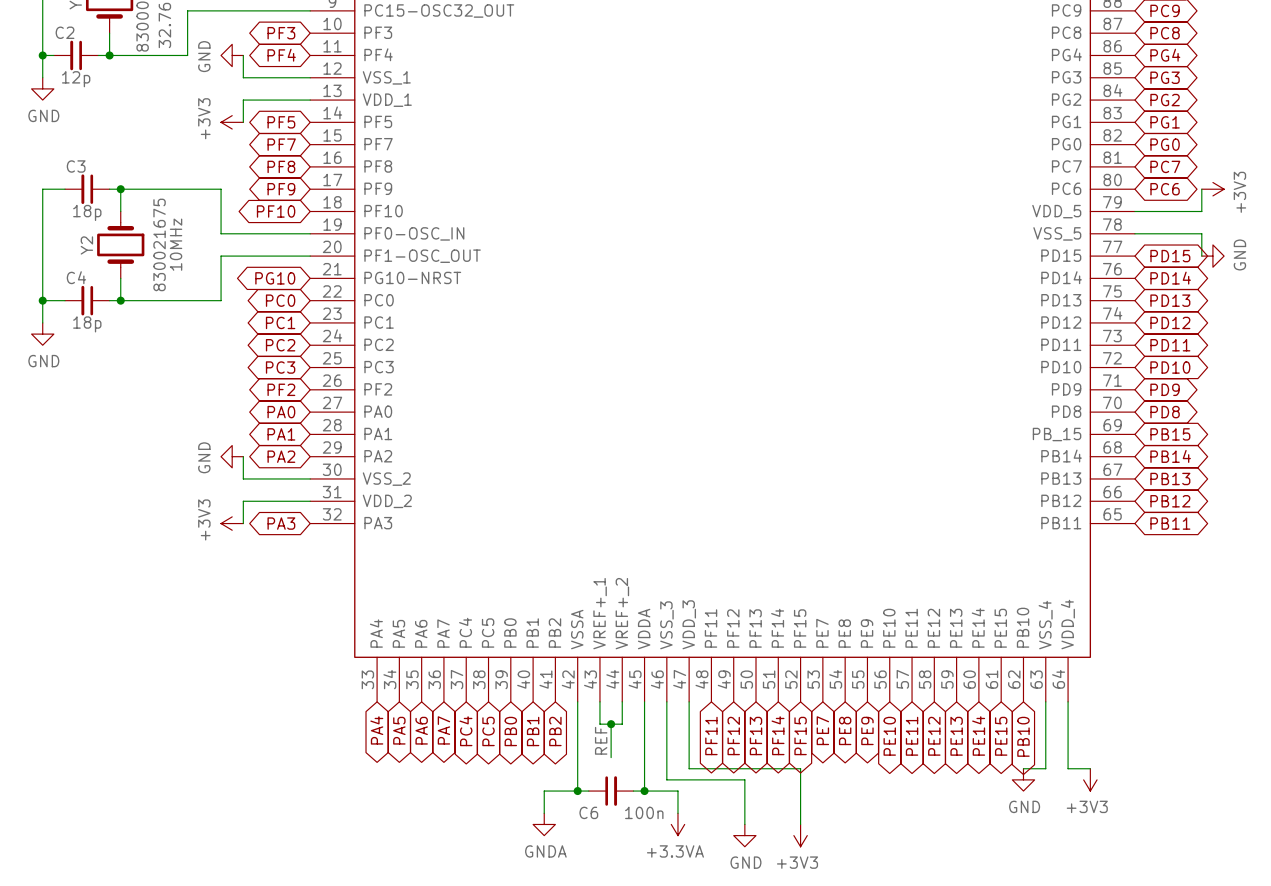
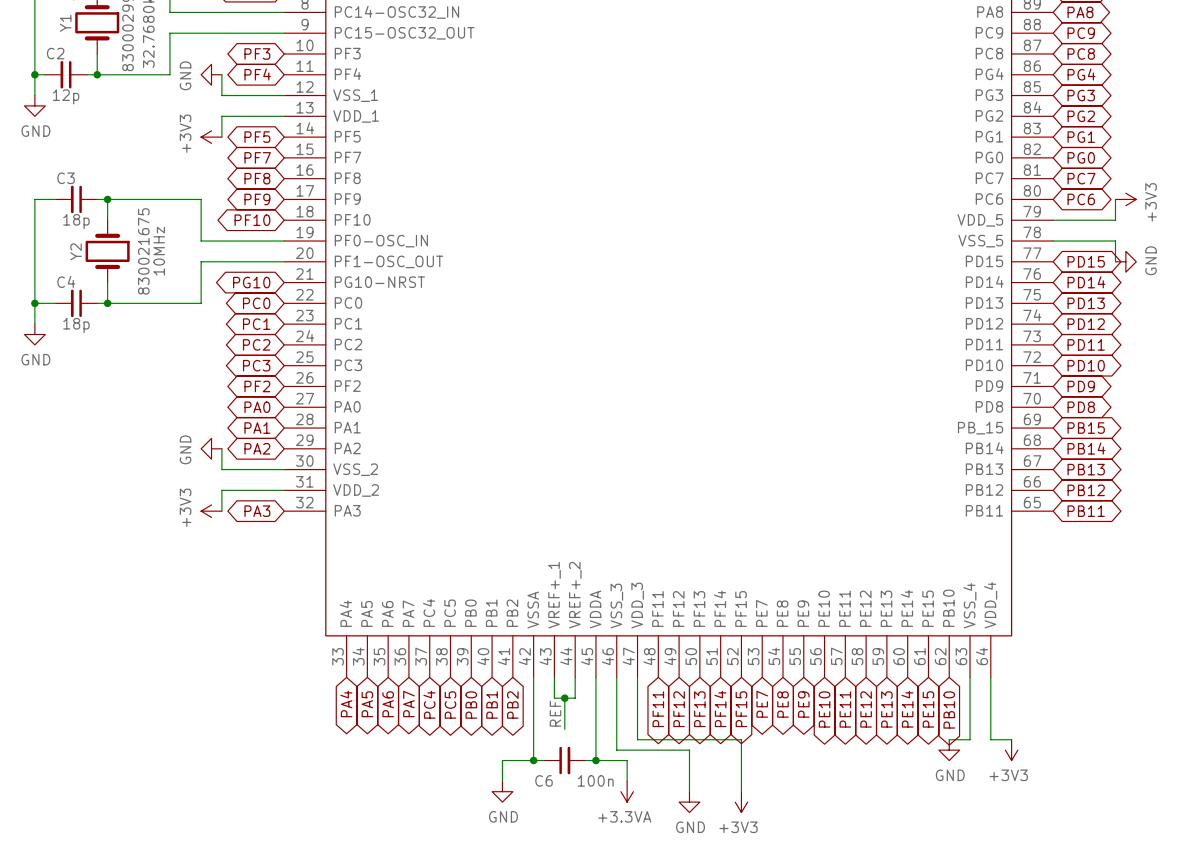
power symbol: GNDA (544, 824) -> GND (502, 791)

